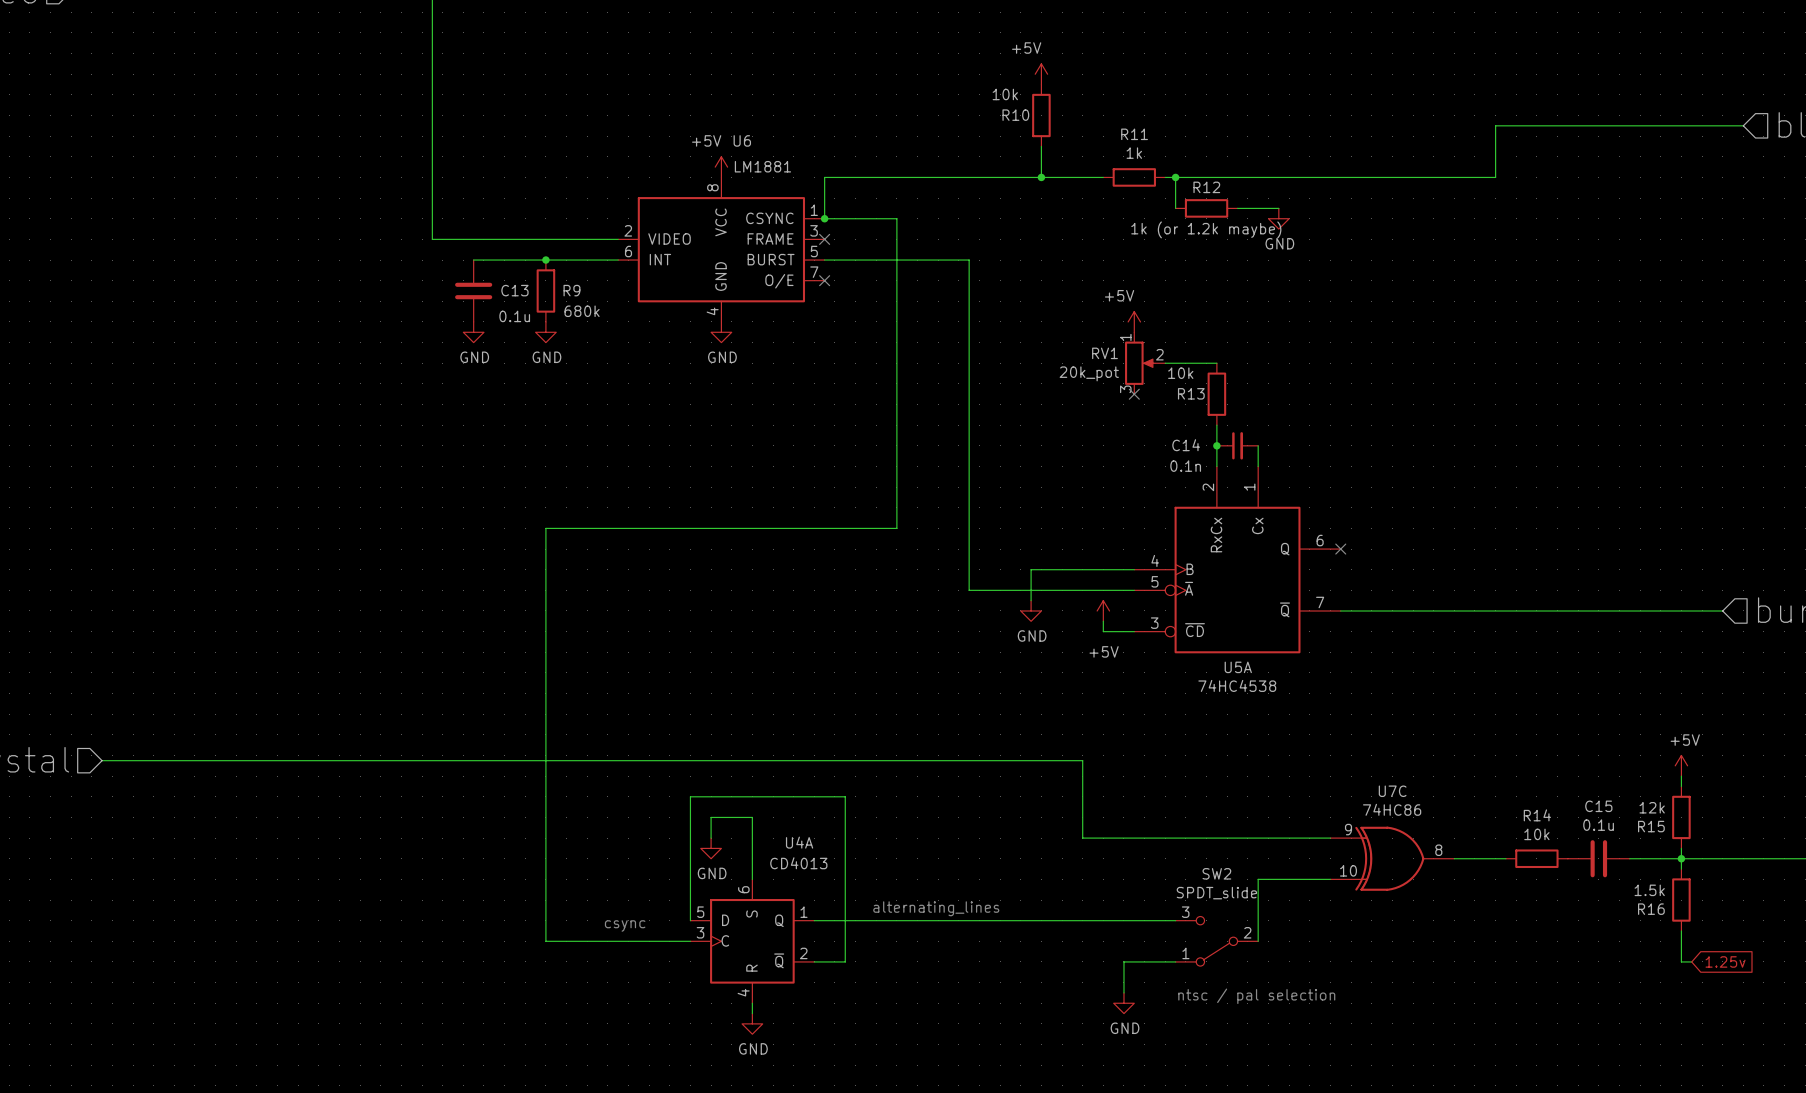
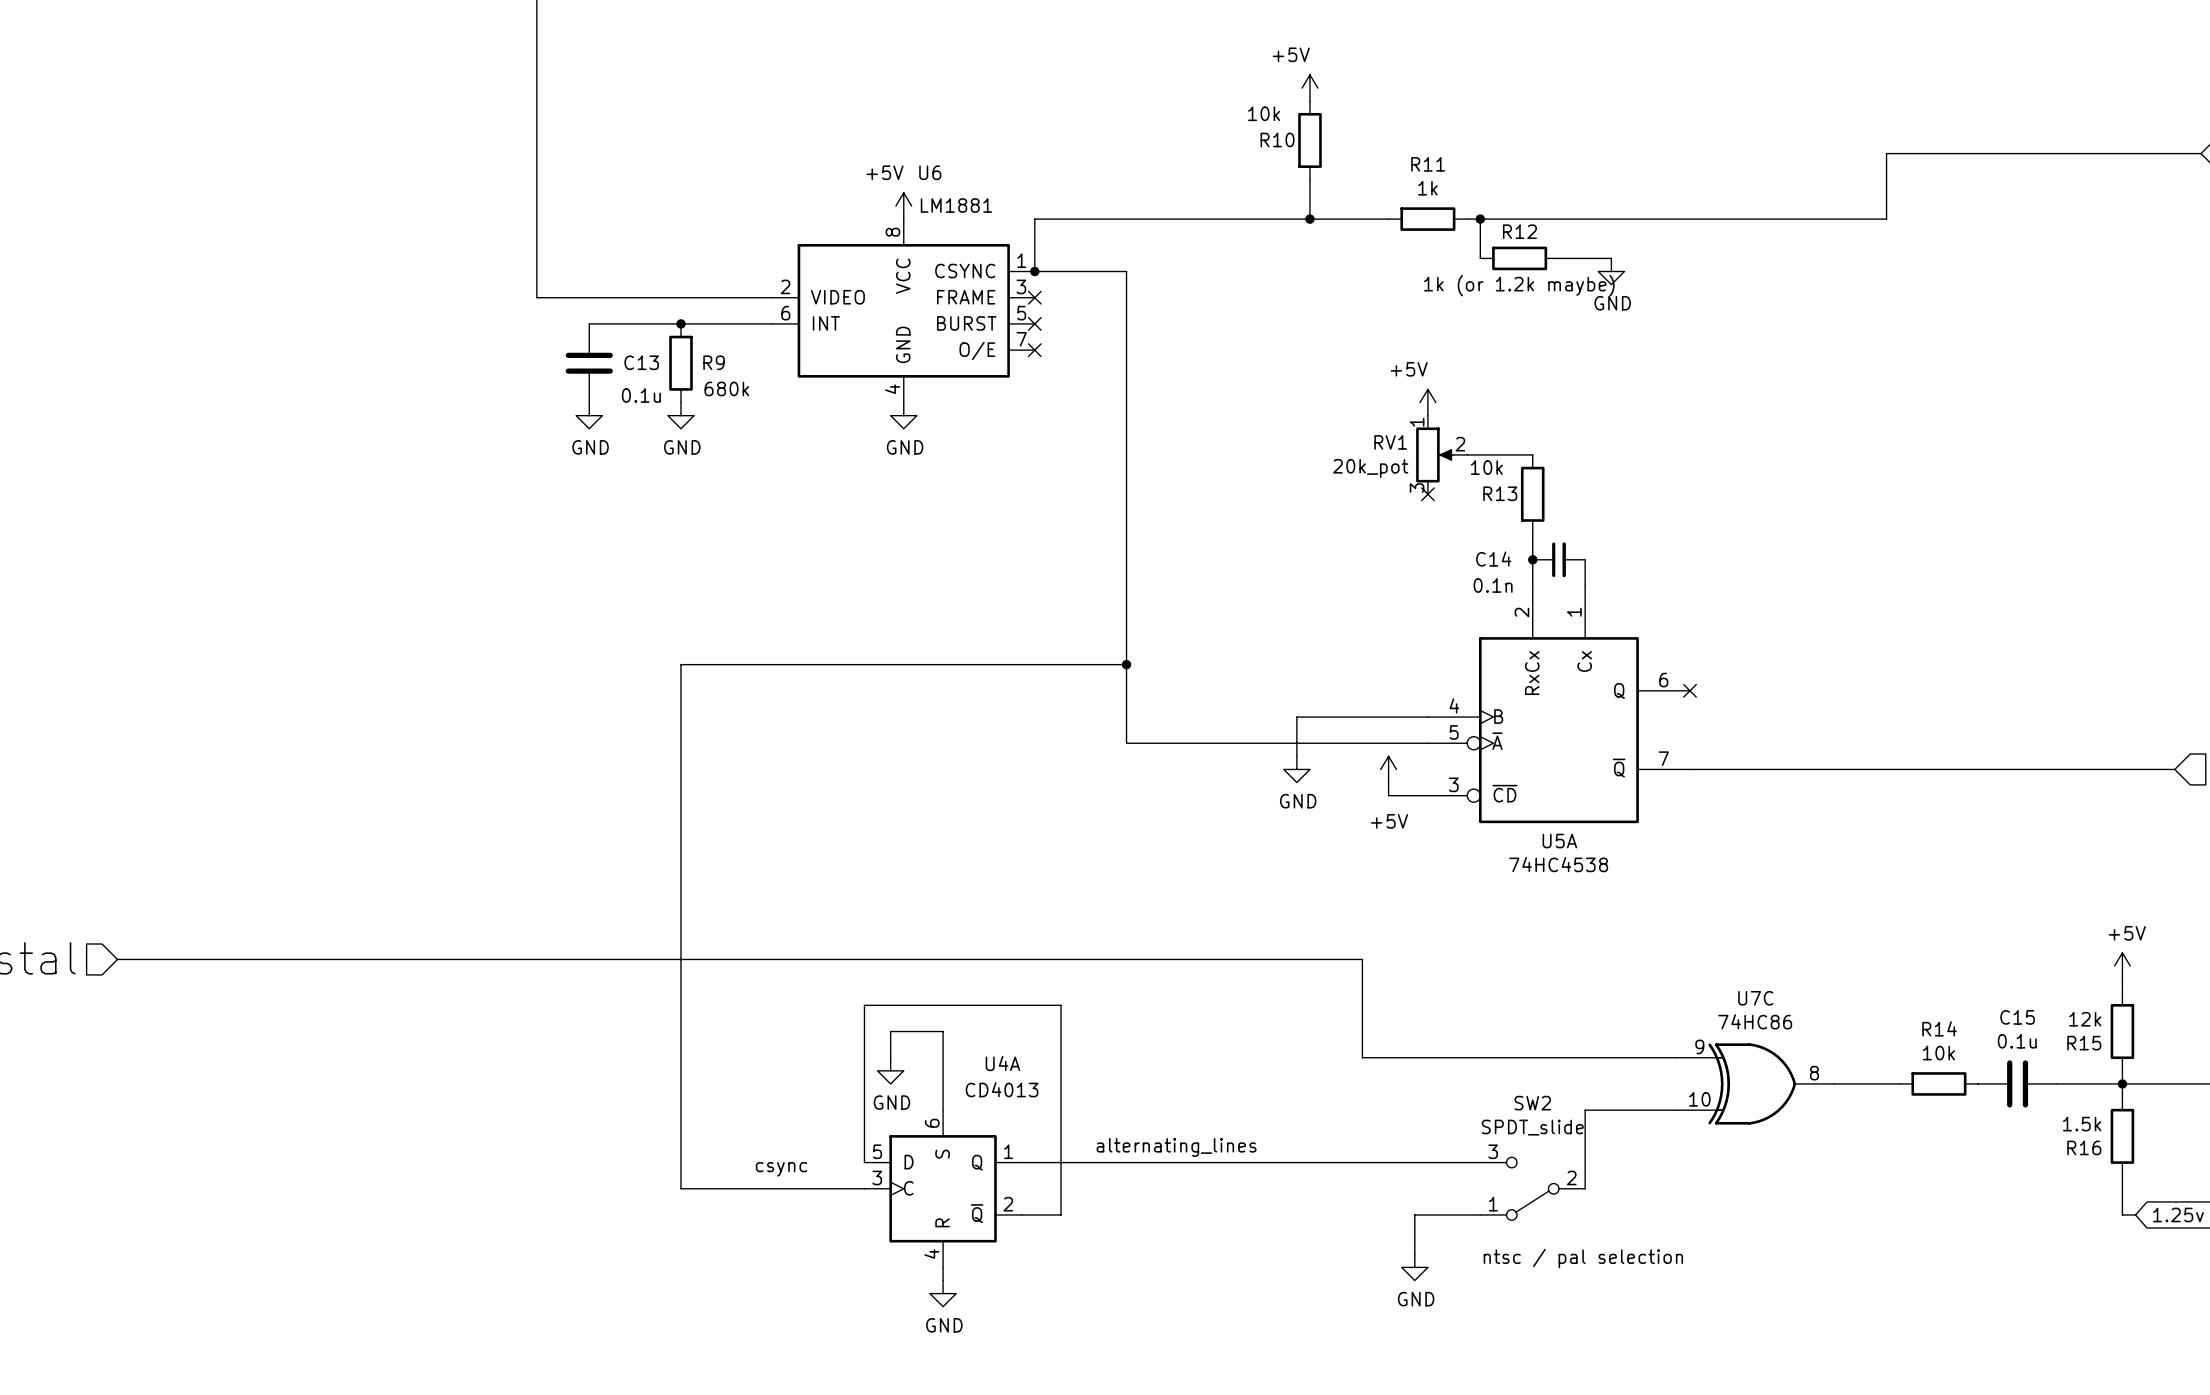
wire: (824, 260) (969, 260) (969, 590) -> (1126, 664) (1126, 743) (1218, 743)
no-connect mark: none -> (1034, 323)
junction: none -> (1126, 664)

